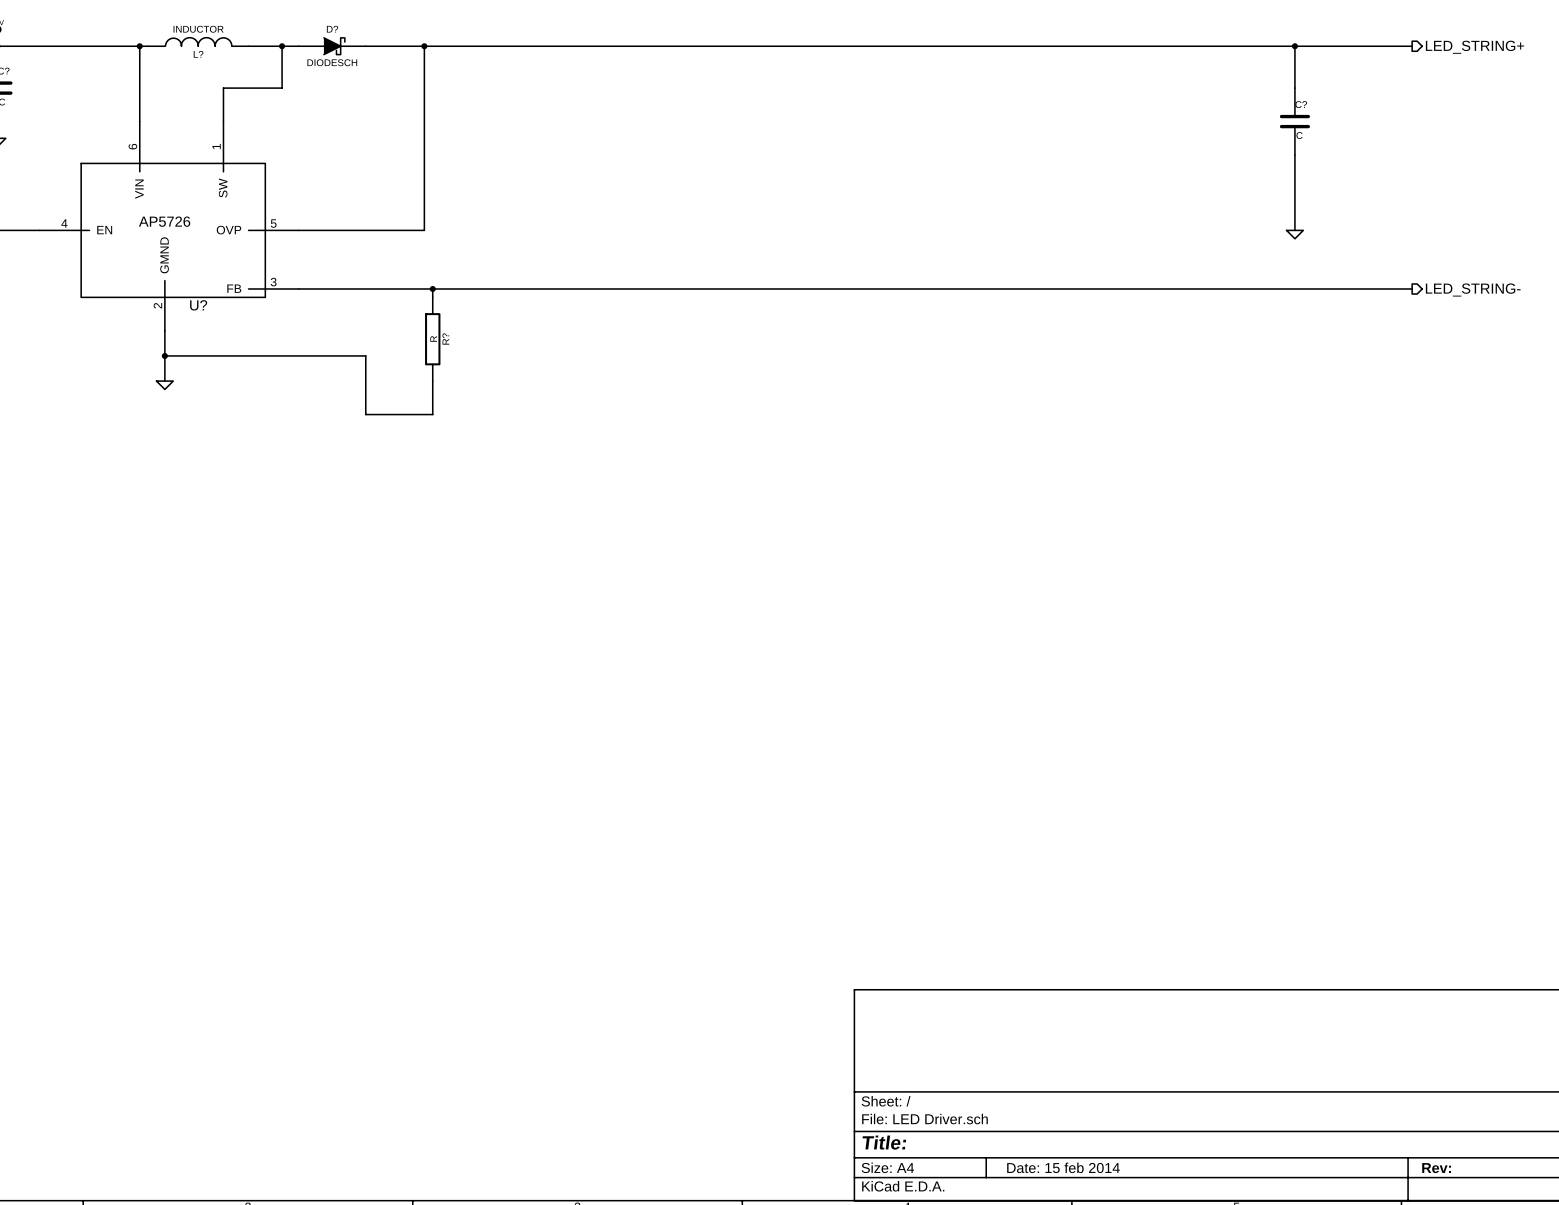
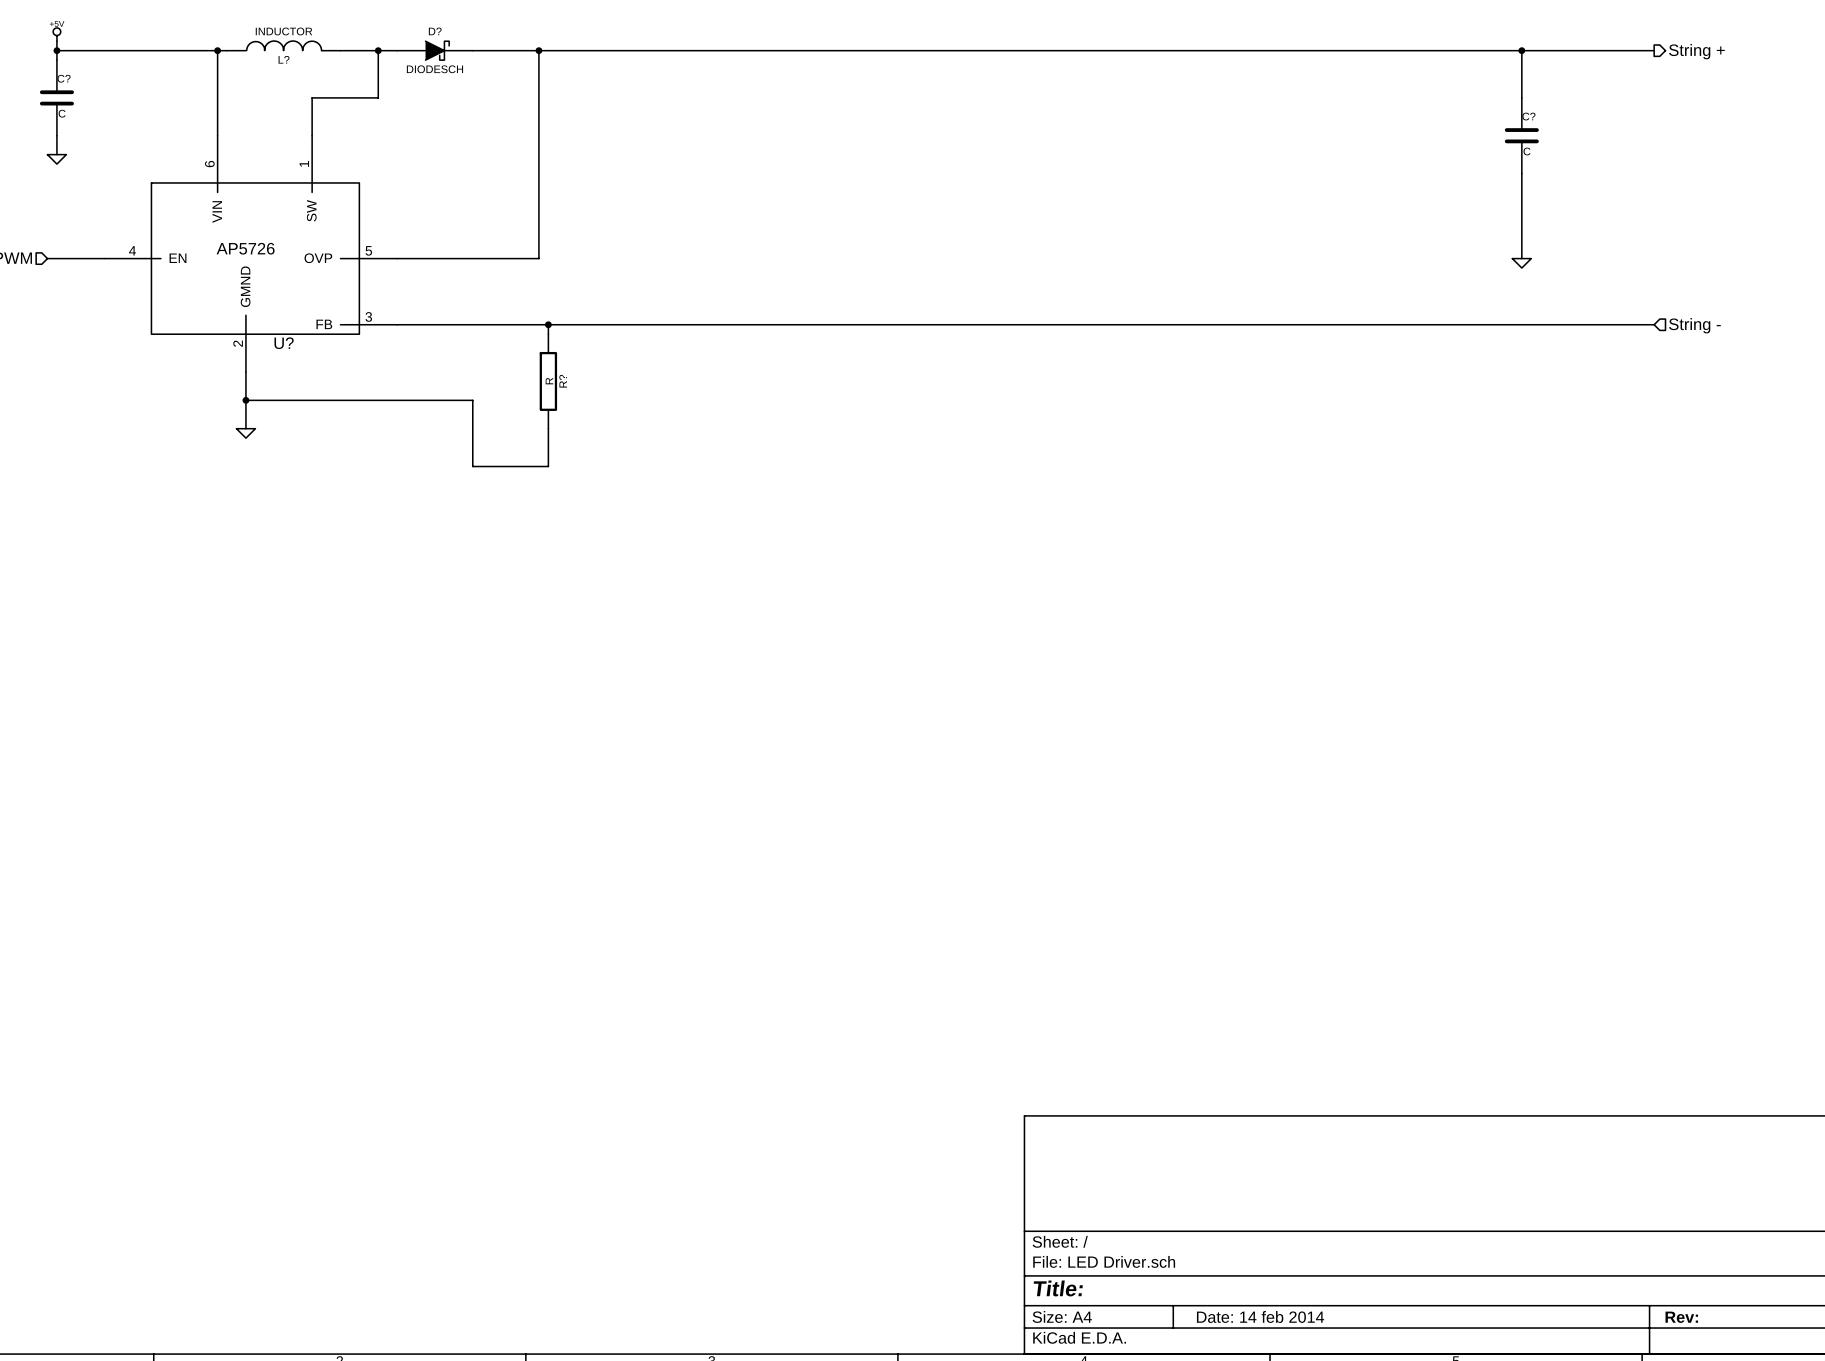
hierarchical label: LED_STRING+ (1475, 47) -> String + (1696, 51)
hierarchical label shape: output (1473, 289) -> input (1694, 325)
hierarchical label: LED_STRING- (1473, 289) -> String - (1694, 325)
title block: Date: 15 feb 2014 (1063, 1167) -> Date: 14 feb 2014 (1260, 1316)

